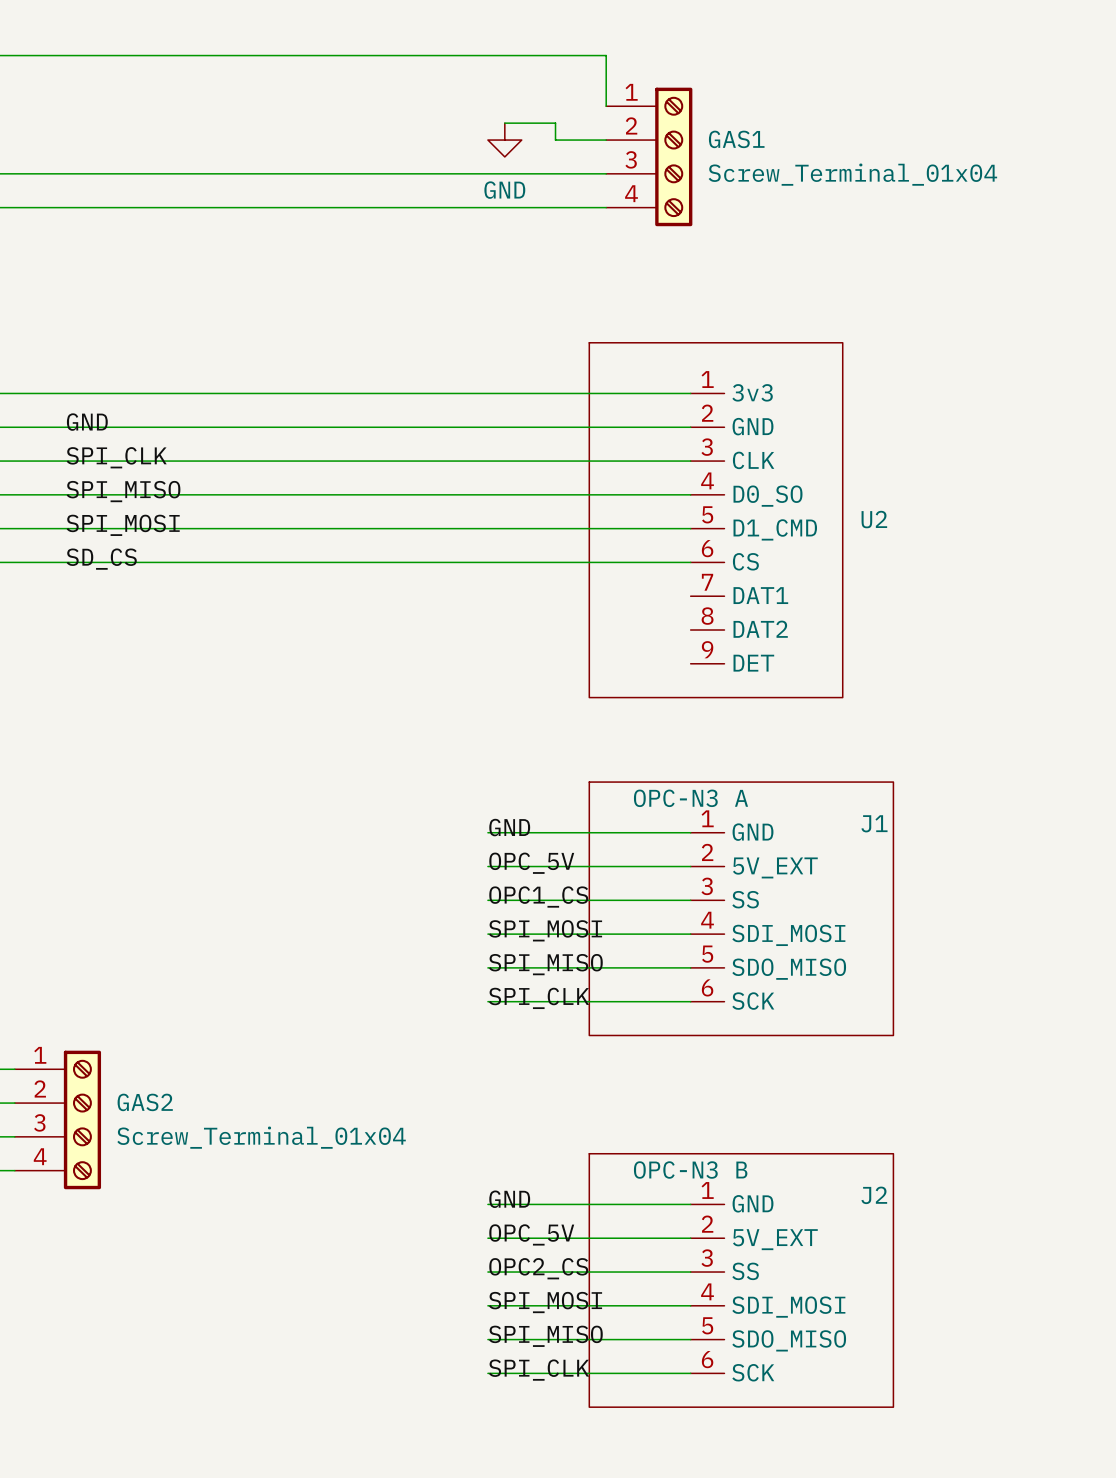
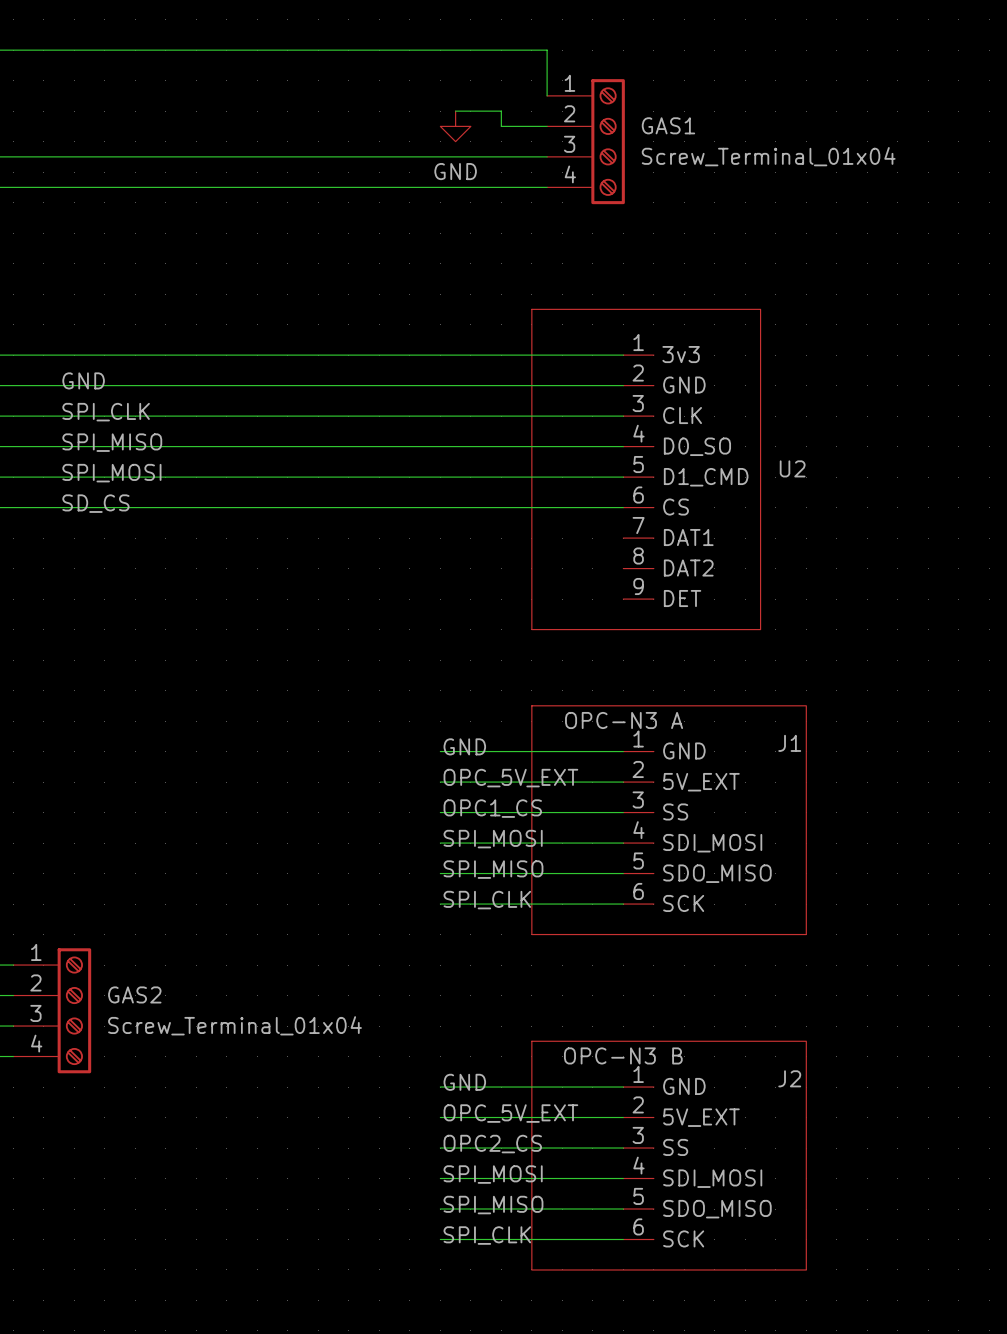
label: OPC_5V (531, 863) -> OPC_5V_EXT (510, 778)
label: OPC_5V (531, 1234) -> OPC_5V_EXT (510, 1113)

